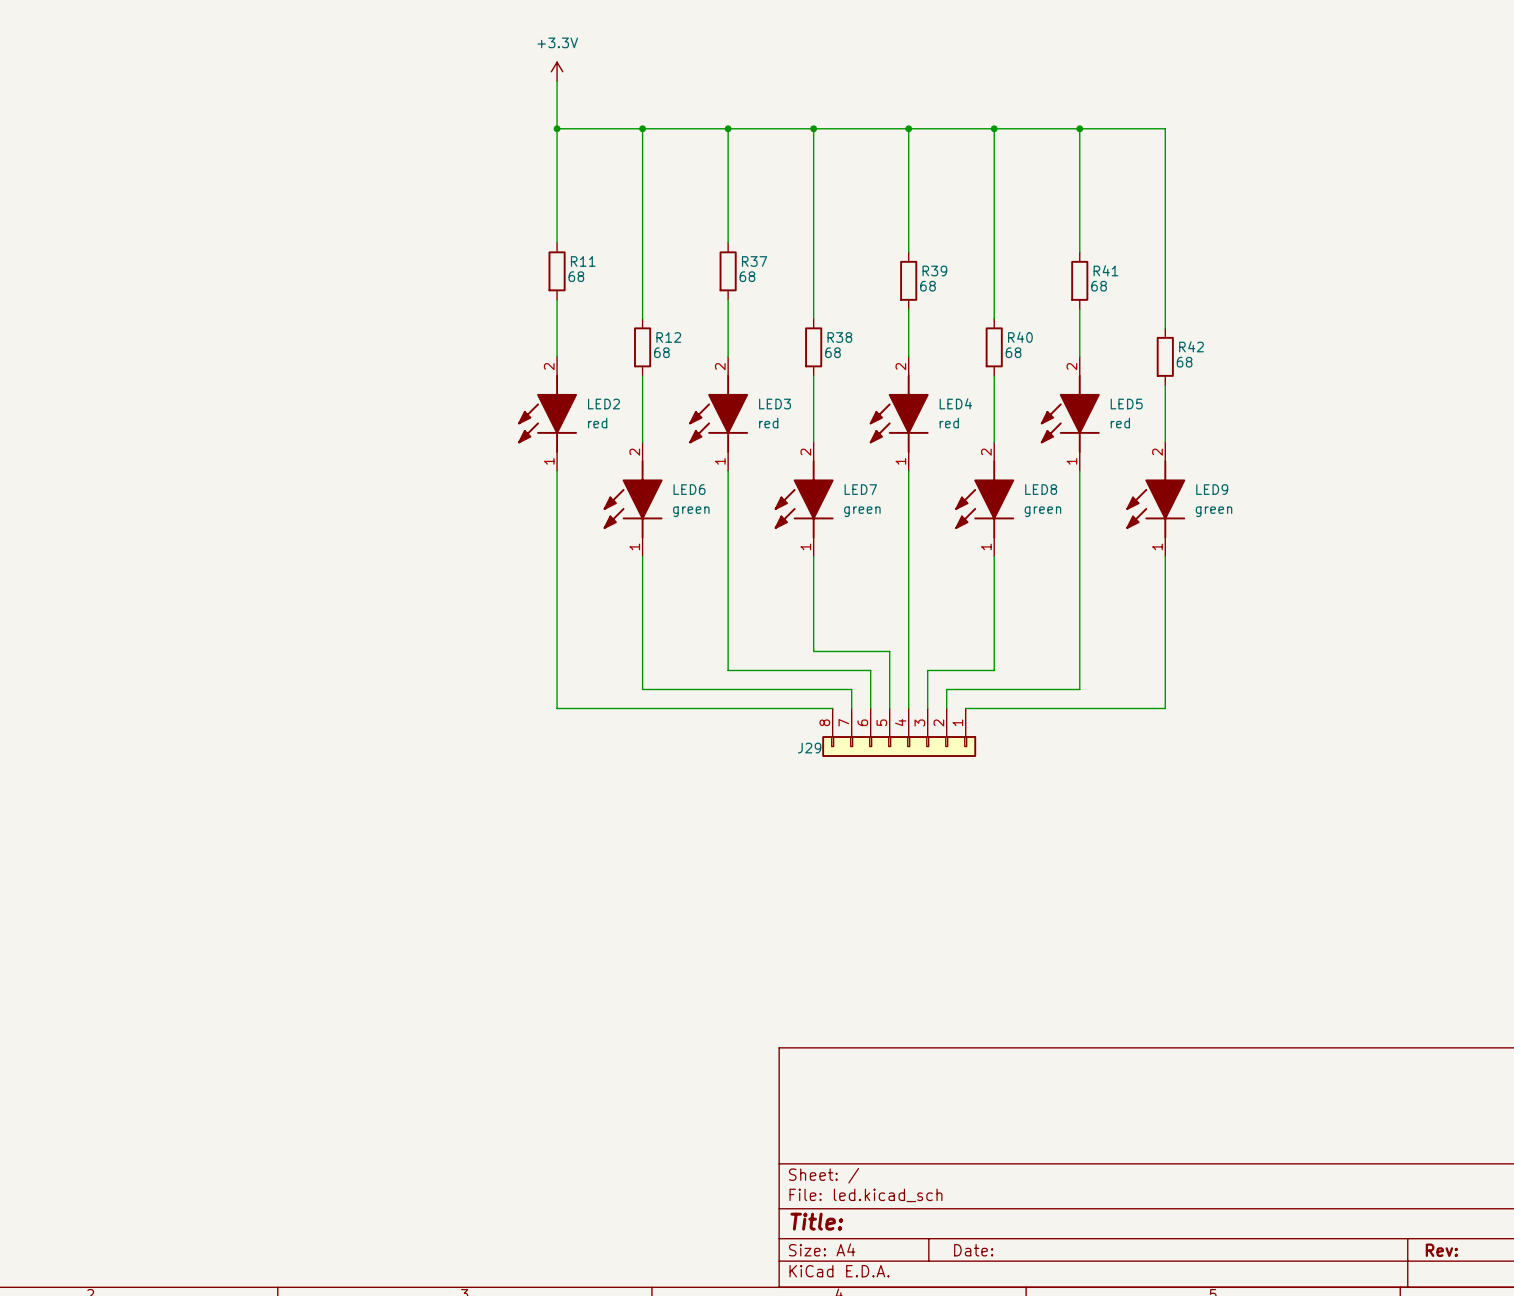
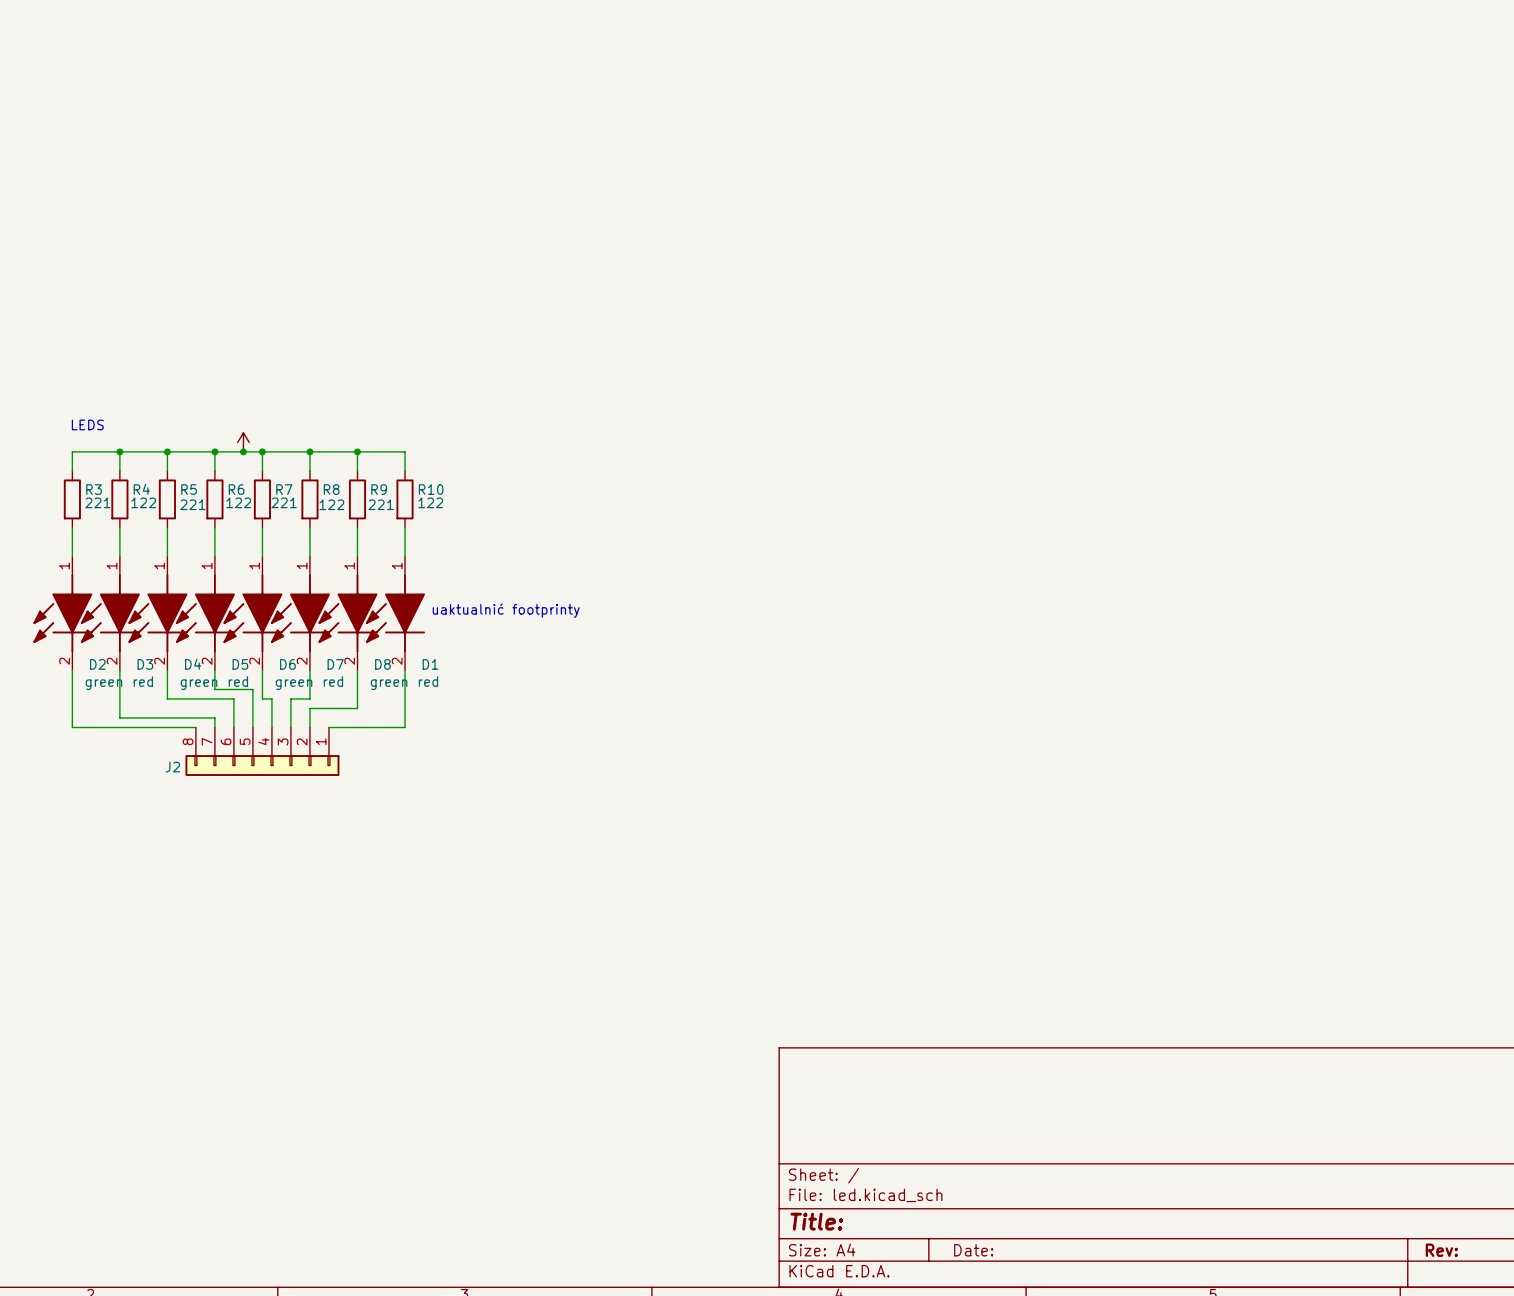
power symbol: +3.3V (557, 71) -> none
wire: (557, 81) (557, 242) -> none
wire: (557, 128) (1165, 128) (1165, 328) -> none
junction: (557, 128) -> none
wire: (642, 128) (642, 318) -> none
junction: (642, 128) -> none
wire: (728, 128) (728, 242) -> none
junction: (728, 128) -> none
wire: (813, 128) (813, 318) -> none
junction: (813, 128) -> none
wire: (908, 128) (908, 252) -> none
junction: (908, 128) -> none
wire: (994, 128) (994, 318) -> none
junction: (994, 128) -> none
wire: (1079, 128) (1079, 252) -> none
junction: (1079, 128) -> none
R11: 68 (557, 271) -> none
R37: 68 (728, 271) -> none
R39: 68 (908, 280) -> none
R41: 68 (1079, 280) -> none
wire: (557, 299) (557, 356) -> none
wire: (728, 299) (728, 356) -> none
wire: (908, 309) (908, 356) -> none
wire: (1079, 309) (1079, 356) -> none
R12: 68 (642, 347) -> none
R38: 68 (813, 347) -> none
R40: 68 (994, 347) -> none
R42: 68 (1165, 356) -> none
wire: (642, 375) (642, 442) -> none
wire: (813, 375) (813, 442) -> none
wire: (994, 375) (994, 442) -> none
wire: (1165, 385) (1165, 442) -> none
LED2: red (547, 413) -> none
LED3: red (718, 413) -> none
LED4: red (899, 413) -> none
LED5: red (1070, 413) -> none
text: none -> LEDS (87, 424)
power symbol: none -> (243, 442)
wire: none -> (119, 451) (119, 470)
junction: none -> (119, 451)
wire: none -> (167, 451) (167, 470)
junction: none -> (167, 451)
wire: none -> (214, 451) (214, 470)
junction: none -> (214, 451)
junction: none -> (243, 451)
wire: none -> (262, 451) (262, 470)
junction: none -> (262, 451)
wire: none -> (309, 451) (309, 470)
junction: none -> (309, 451)
wire: none -> (357, 451) (357, 470)
junction: none -> (357, 451)
wire: none -> (72, 470) (72, 451) (405, 451) (405, 470)
wire: (557, 470) (557, 708) (832, 708) -> none
wire: (728, 470) (728, 670) (870, 670) (870, 708) -> none
wire: (908, 470) (908, 708) -> none
wire: (1079, 470) (1079, 689) (946, 689) (946, 708) -> none
R3: none -> 221 (72, 499)
R4: none -> 122 (119, 499)
R5: none -> 221 (167, 499)
R6: none -> 122 (214, 499)
R7: none -> 221 (262, 499)
R8: none -> 122 (309, 499)
R9: none -> 221 (357, 499)
R10: none -> 122 (405, 499)
LED6: green (633, 499) -> none
LED7: green (804, 499) -> none
LED8: green (984, 499) -> none
LED9: green (1155, 499) -> none
wire: none -> (72, 527) (72, 556)
wire: none -> (119, 527) (119, 556)
wire: none -> (167, 527) (167, 556)
wire: none -> (214, 527) (214, 556)
wire: none -> (262, 527) (262, 556)
wire: none -> (309, 527) (309, 556)
wire: none -> (357, 527) (357, 556)
wire: none -> (405, 527) (405, 556)
wire: (642, 556) (642, 689) (851, 689) (851, 708) -> none
wire: (813, 556) (813, 651) (889, 651) (889, 708) -> none
wire: (994, 556) (994, 670) (927, 670) (927, 708) -> none
wire: (1165, 556) (1165, 708) (965, 708) -> none
text: none -> uaktualnić footprinty (506, 610)
D2: none -> green (62, 613)
D3: none -> red (110, 613)
D4: none -> green (157, 613)
D5: none -> red (205, 613)
D6: none -> green (252, 613)
D7: none -> red (300, 613)
D8: none -> green (347, 613)
D1: none -> red (395, 613)
wire: none -> (72, 670) (72, 727) (195, 727)
wire: none -> (119, 670) (119, 718) (214, 718) (214, 727)
wire: none -> (167, 670) (167, 698) (233, 698) (233, 727)
wire: none -> (214, 670) (214, 689) (252, 689) (252, 727)
wire: none -> (262, 670) (262, 698) (271, 698) (271, 727)
wire: none -> (309, 670) (309, 698) (290, 698) (290, 727)
wire: none -> (357, 670) (357, 708) (309, 708) (309, 727)
wire: none -> (405, 670) (405, 727) (328, 727)
J29: (899, 732) -> none
J2: none -> (262, 751)

